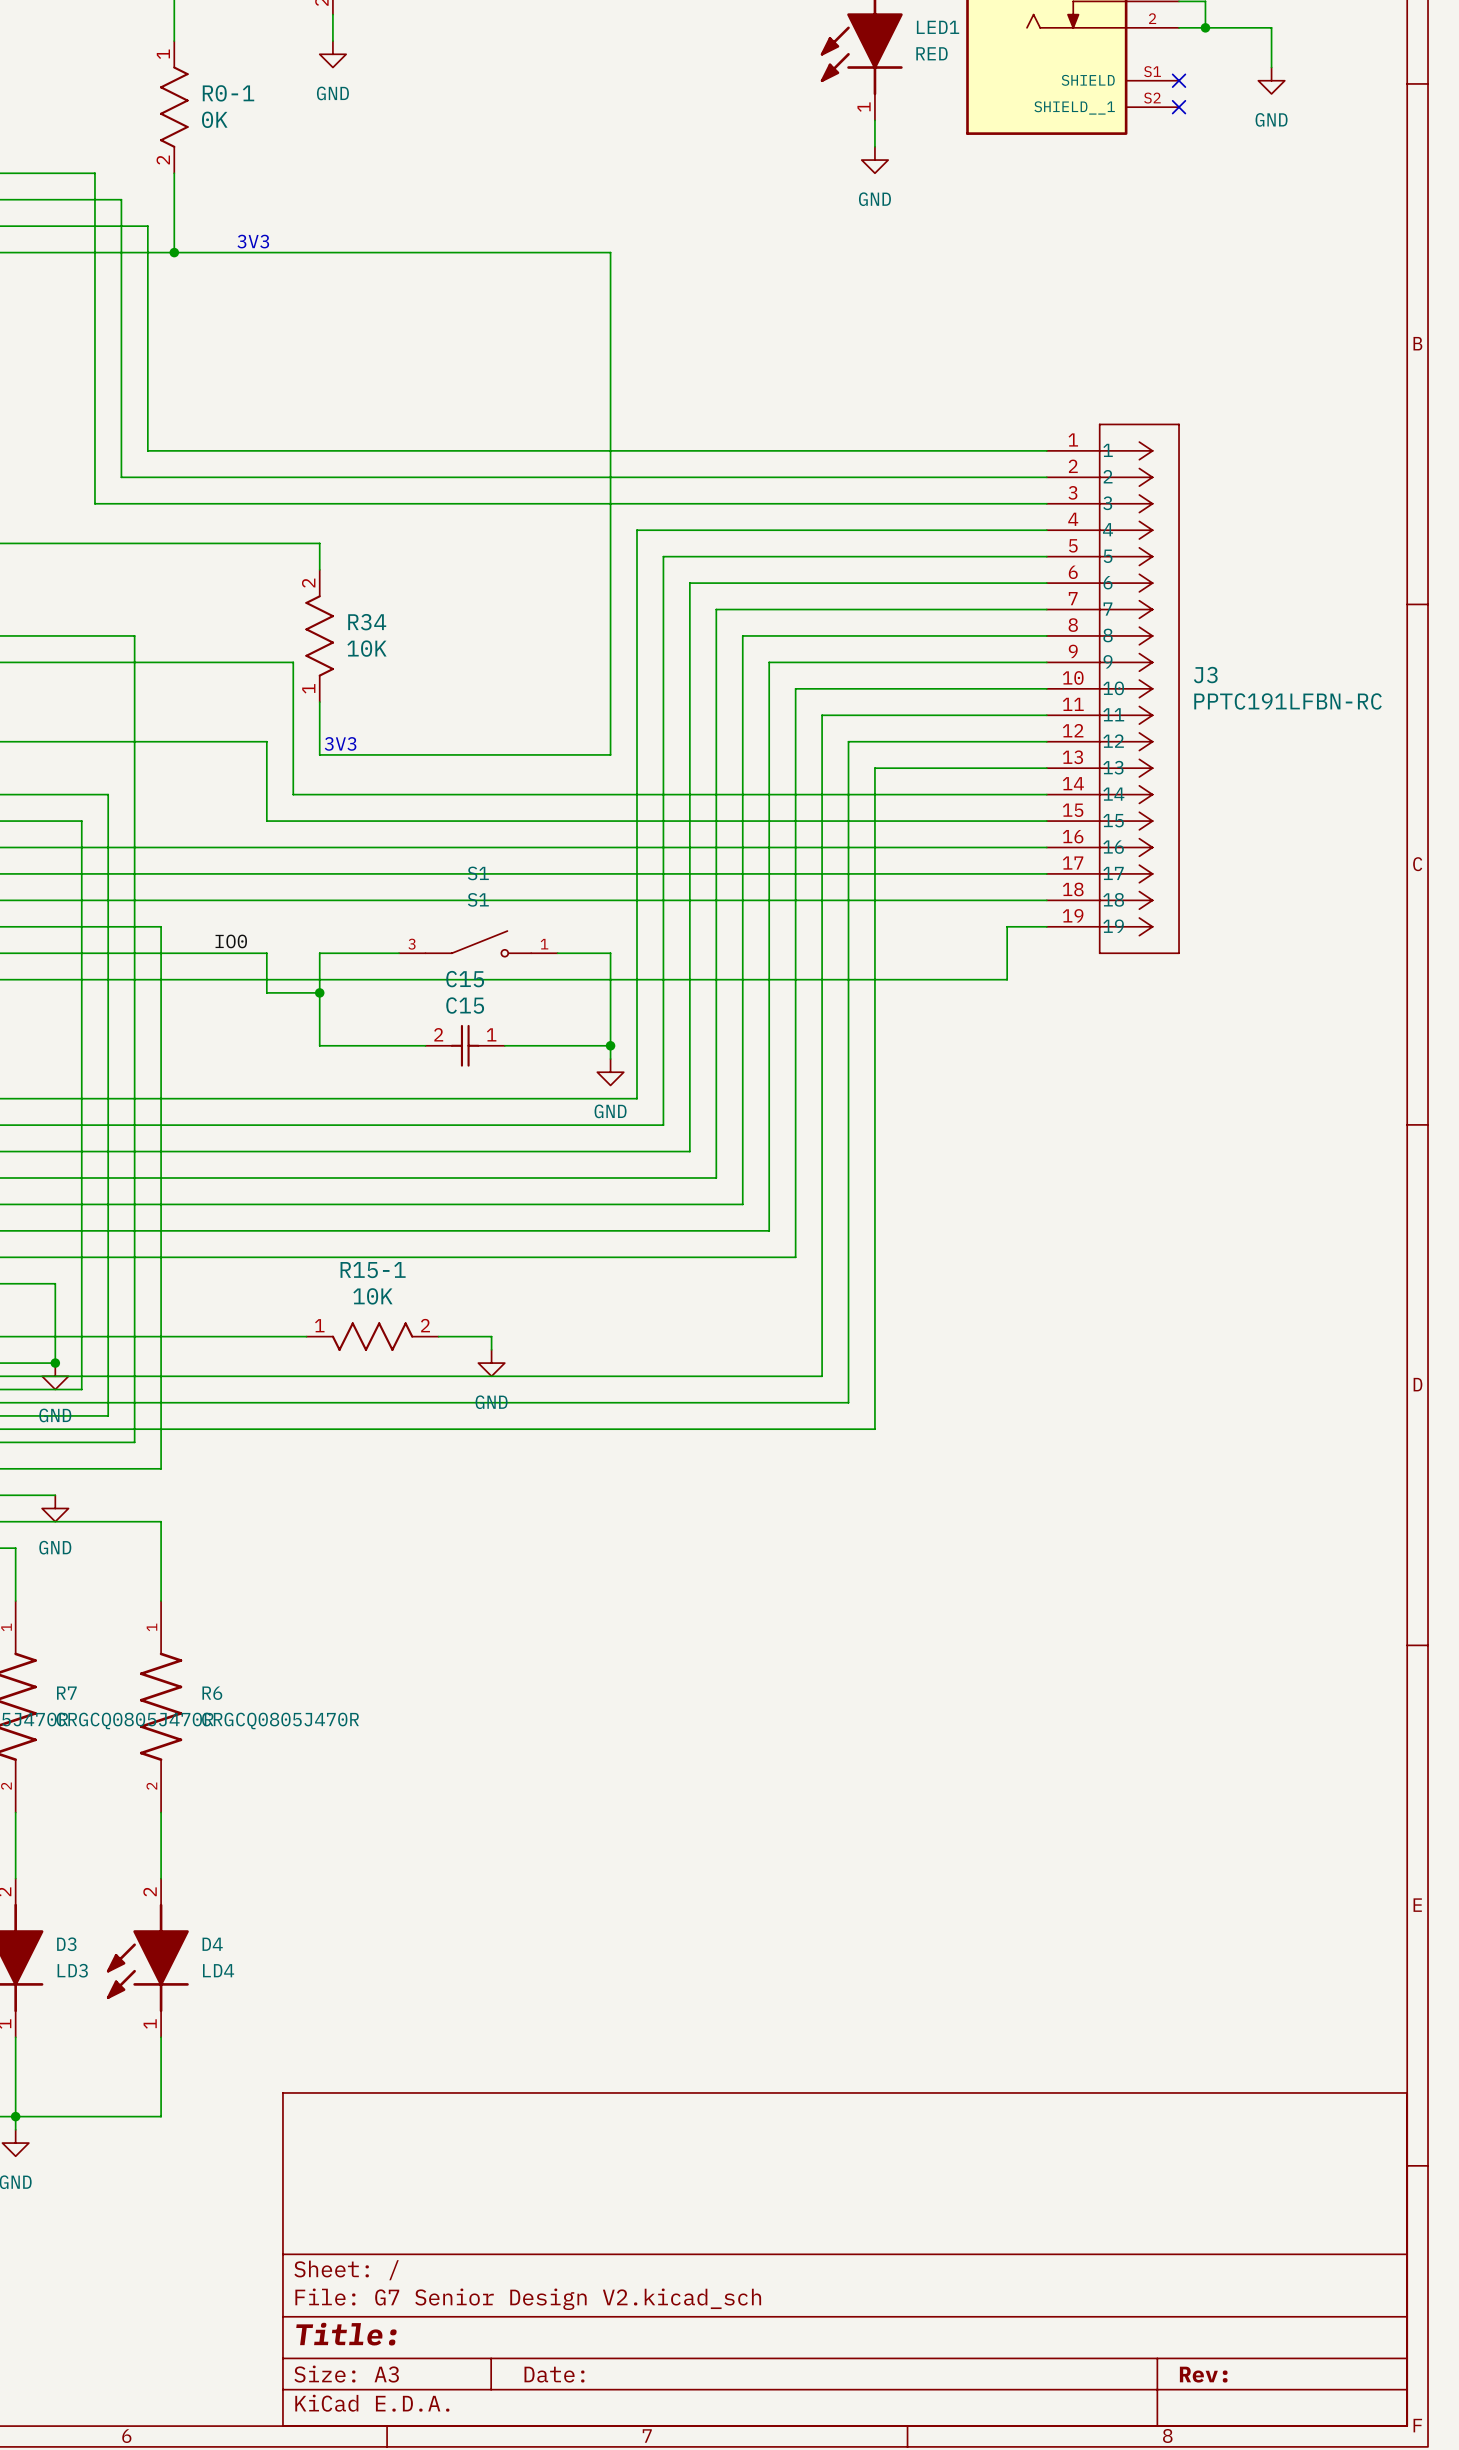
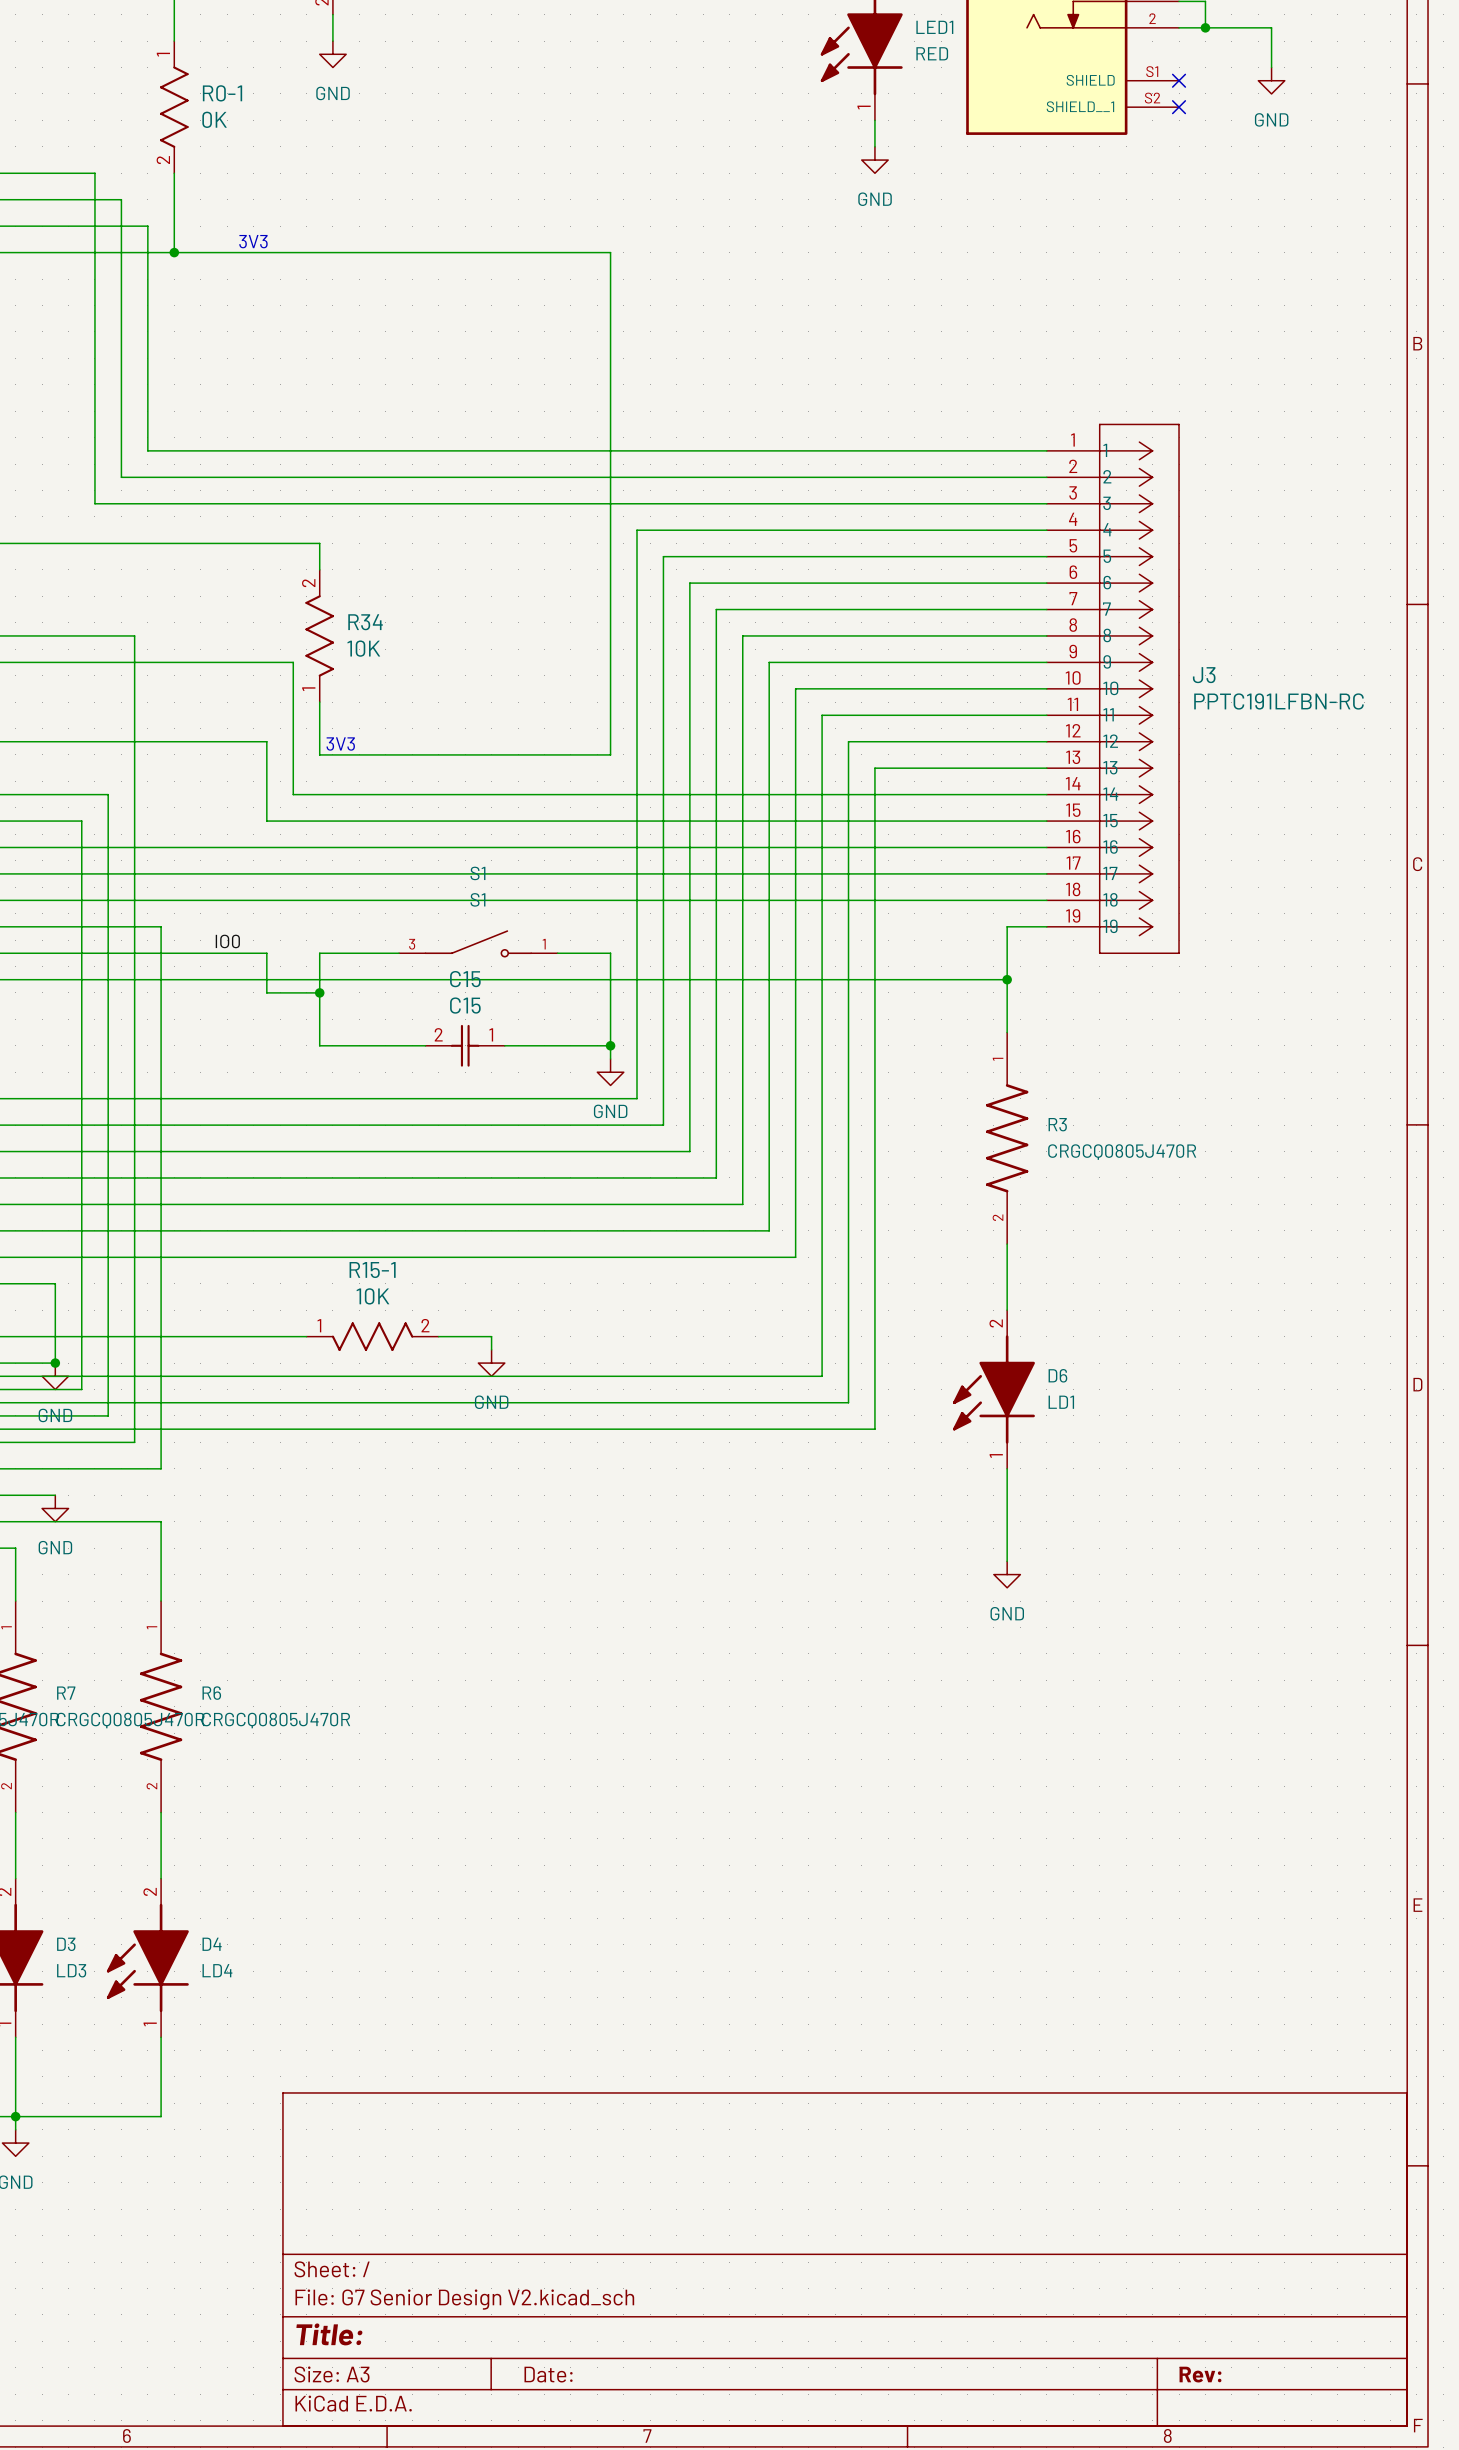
wire: none -> (1007, 979) (1007, 1032)
junction: none -> (1007, 979)
R3: none -> CRGCQ0805J470R (1007, 1138)
wire: none -> (1007, 1244) (1007, 1310)
D6: none -> LD1 (993, 1389)
wire: none -> (1007, 1468) (1007, 1561)
power symbol: none -> GND (1007, 1574)

